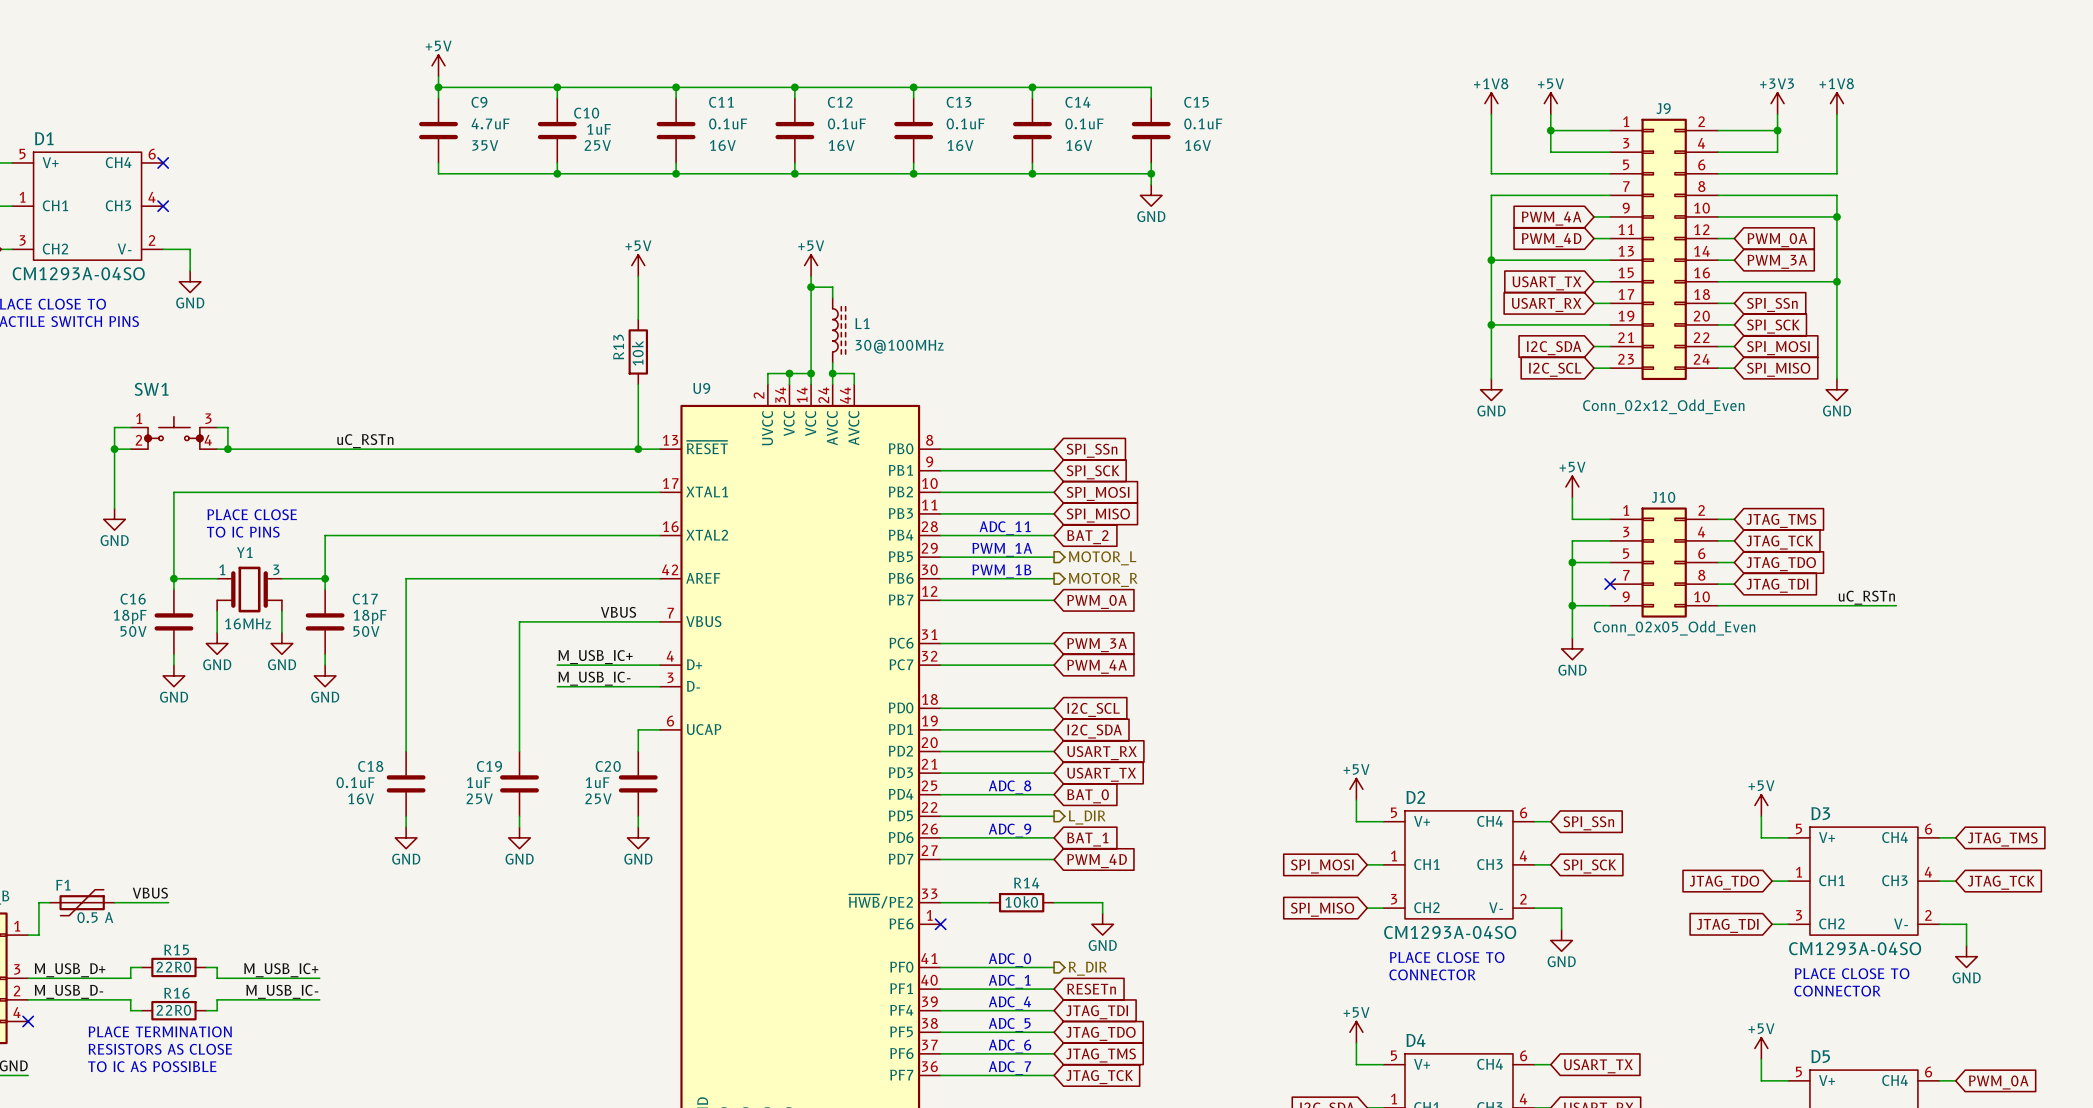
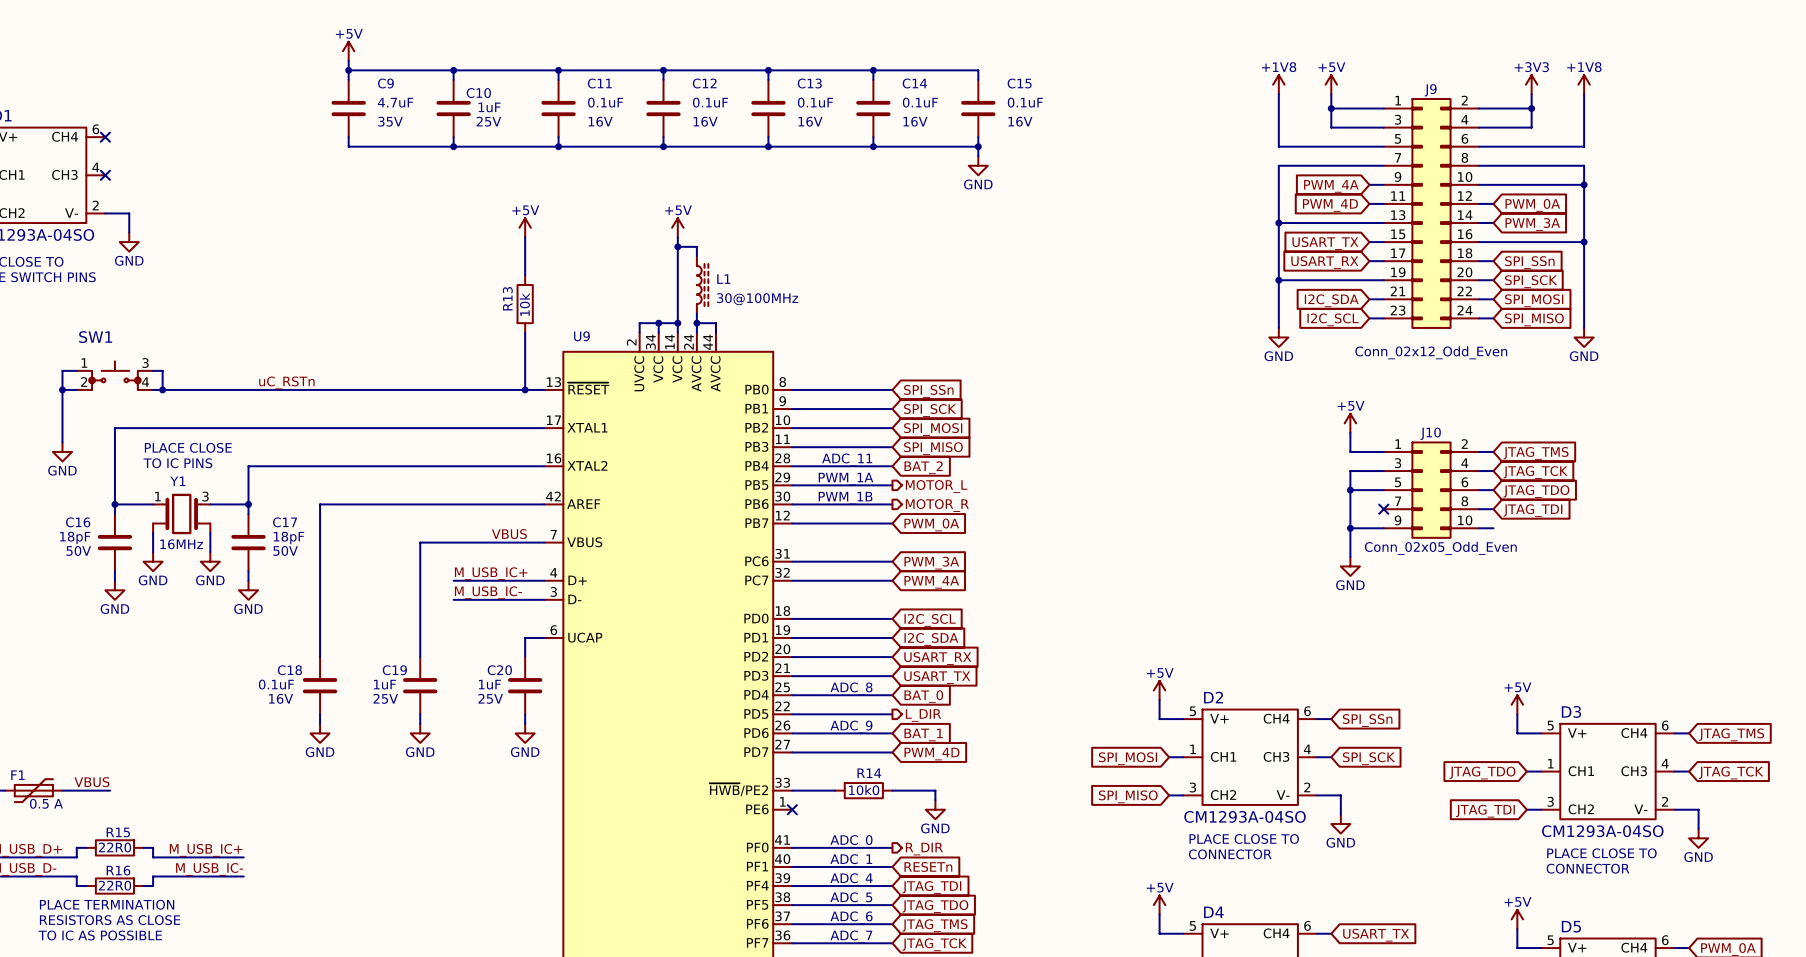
label: uC_RSTn (1866, 597) -> none
wire: (1734, 605) (1896, 605) -> none

